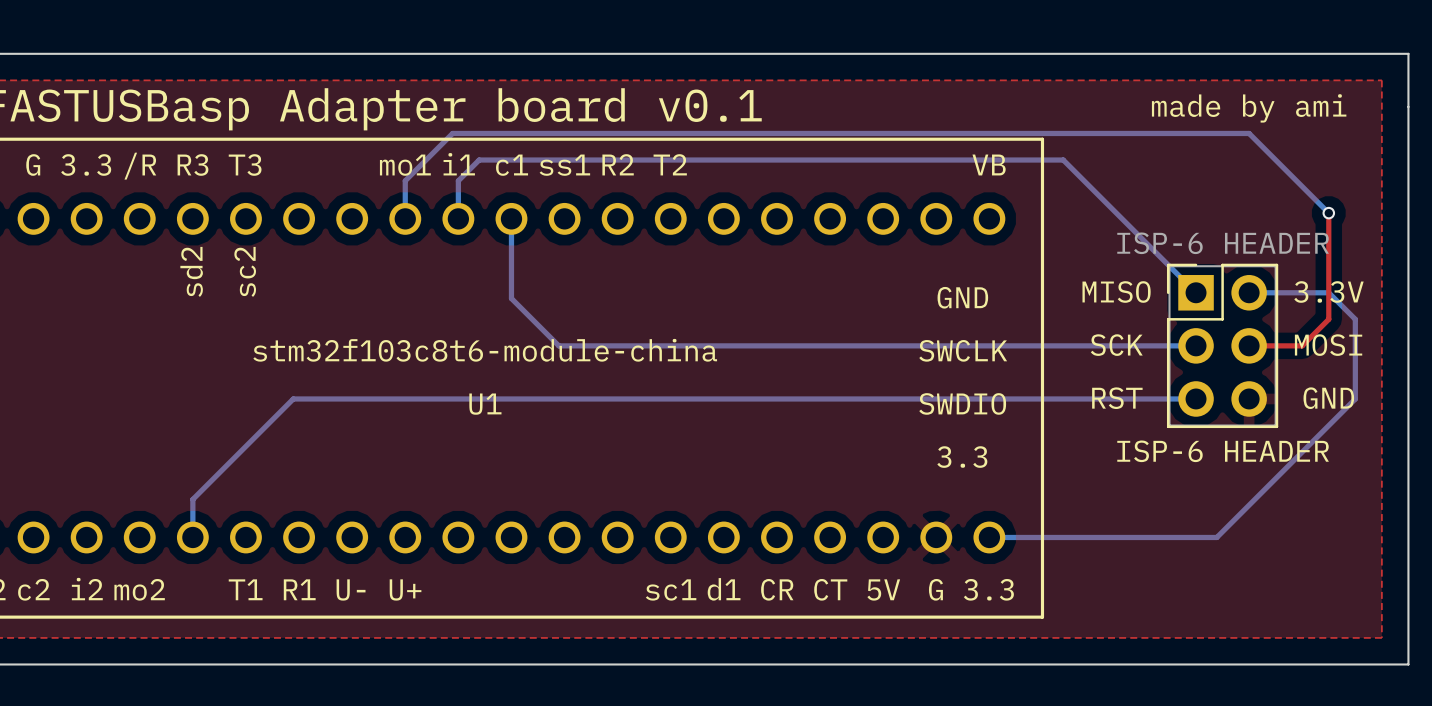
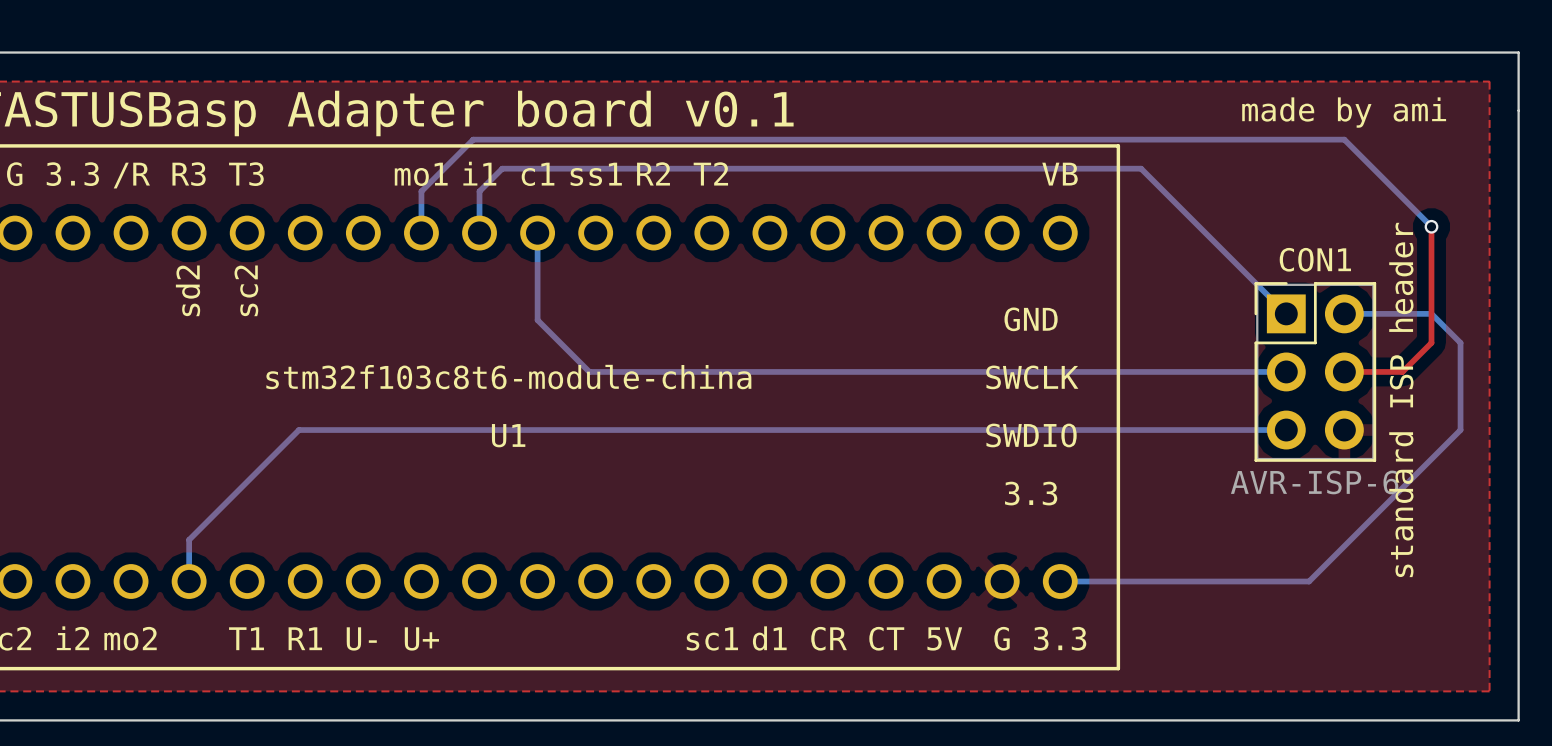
CON1 name: none -> CON1 (1315, 259)
CON1 text: ISP-6 HEADER (1223, 243) -> none
text: MISO (1116, 291) -> none
text: 3.3V (1328, 291) -> none
text: SCK (1116, 345) -> none
text: MOSI (1328, 345) -> none
text: none -> standard ISP header (1401, 399)
text: RST (1117, 398) -> none
text: GND (1328, 398) -> none
CON1 value: none -> AVR-ISP-6 (1314, 482)
text: ISP-6 HEADER (1223, 451) -> none

